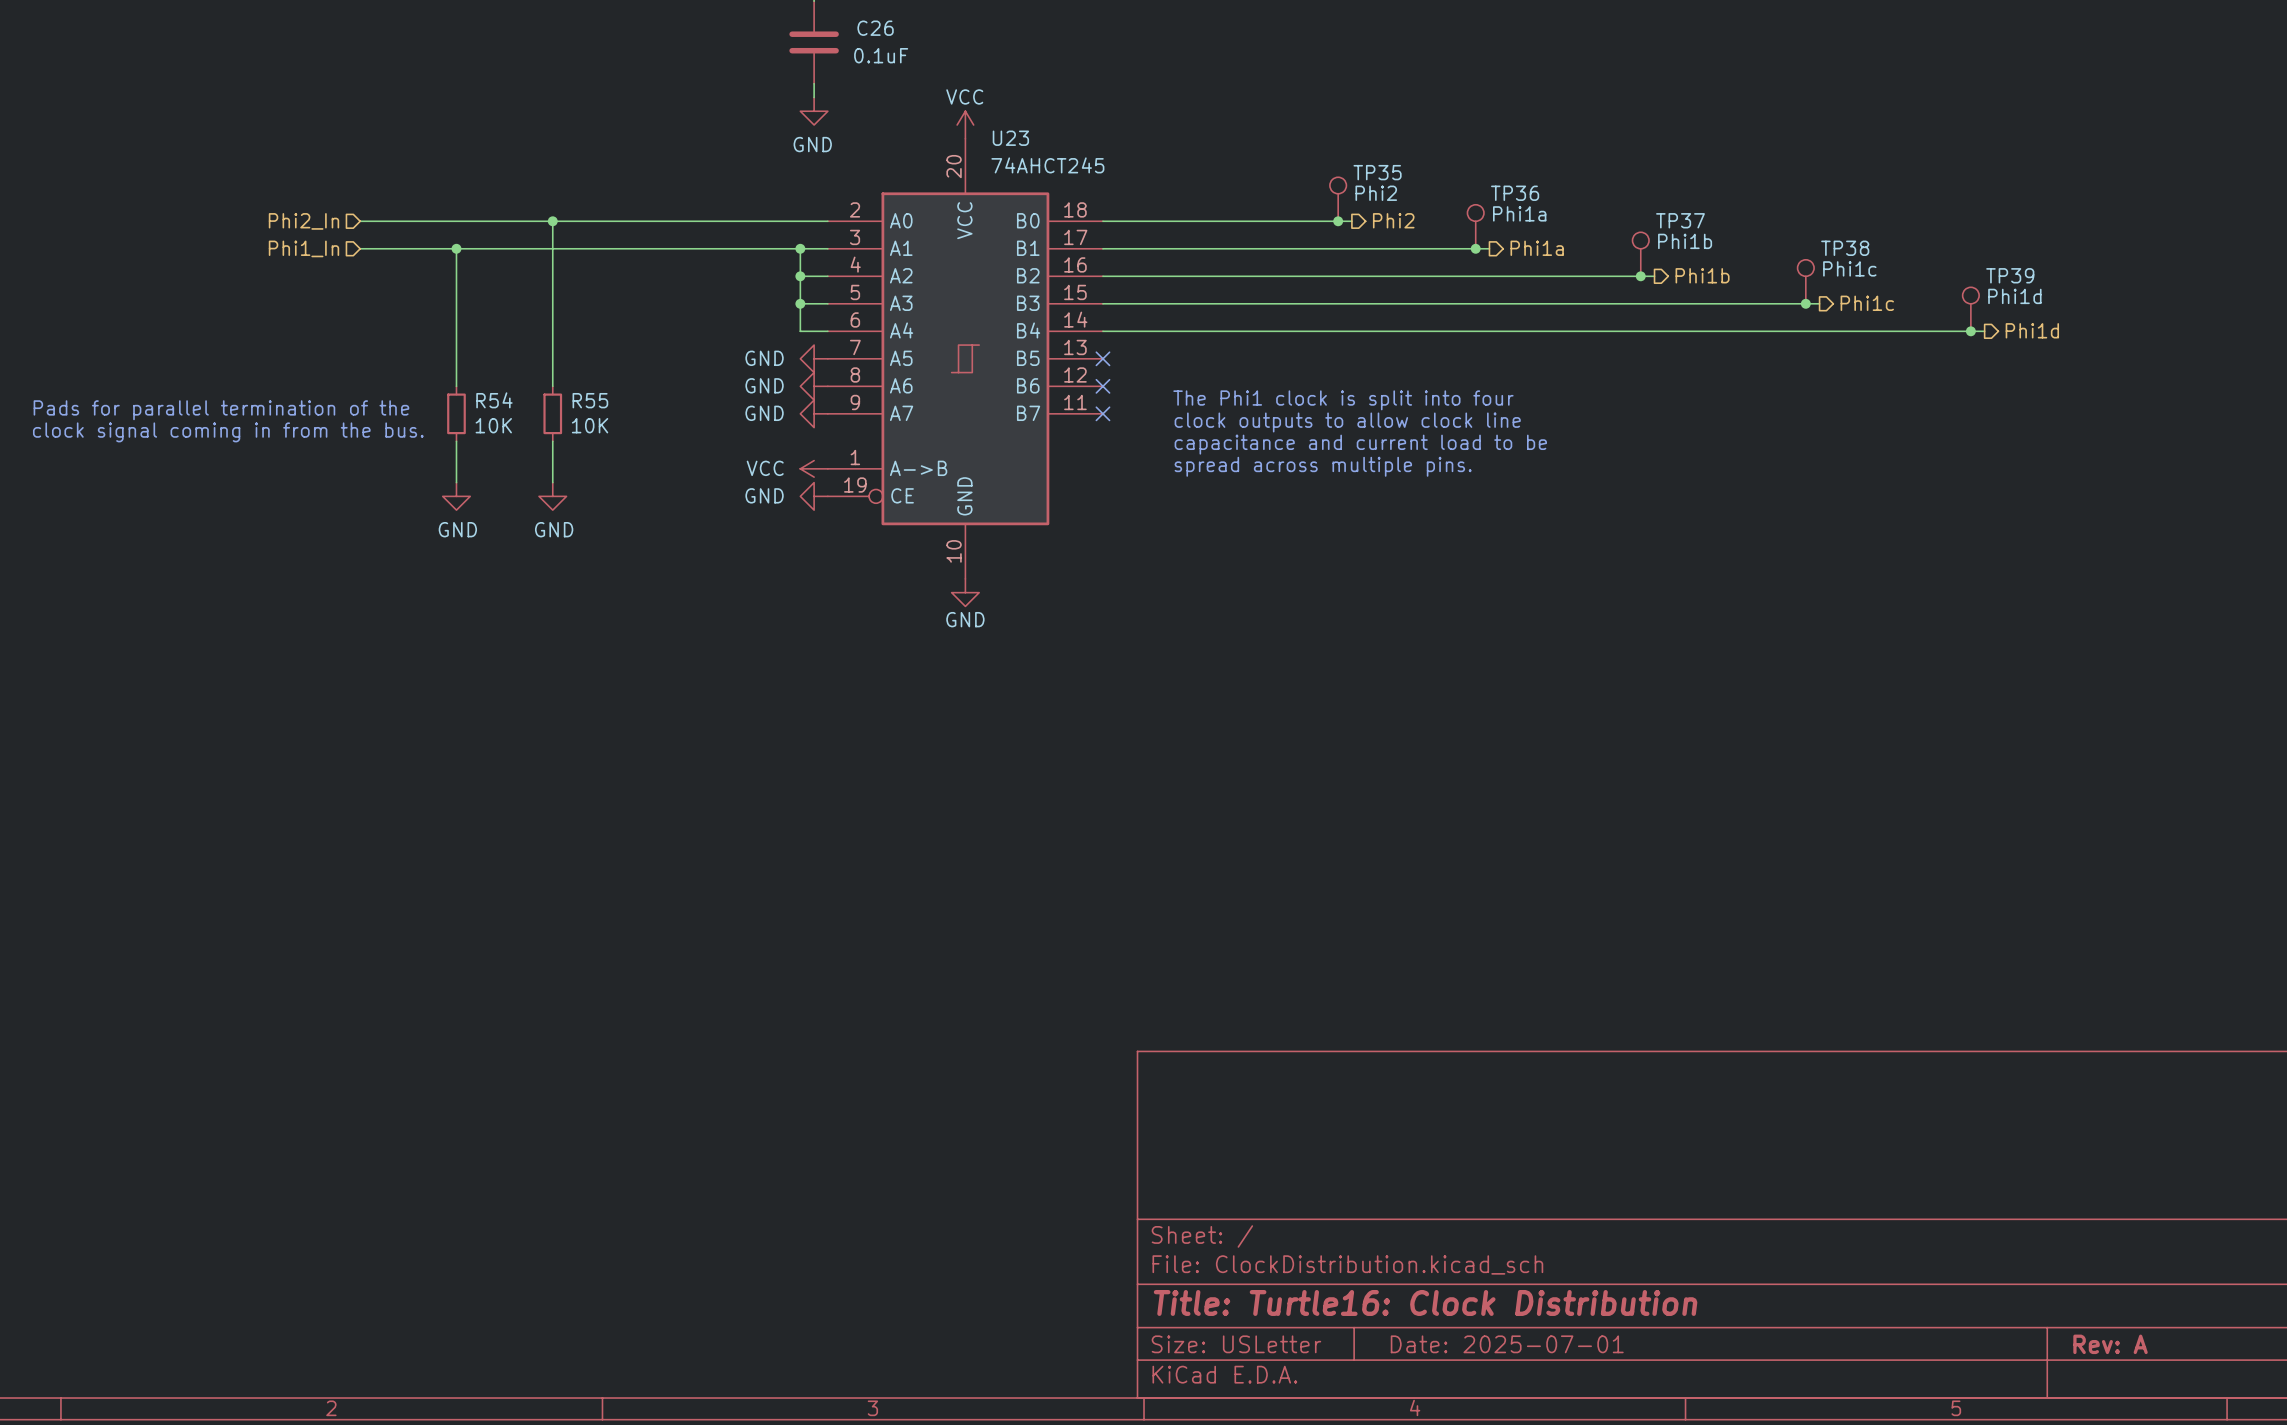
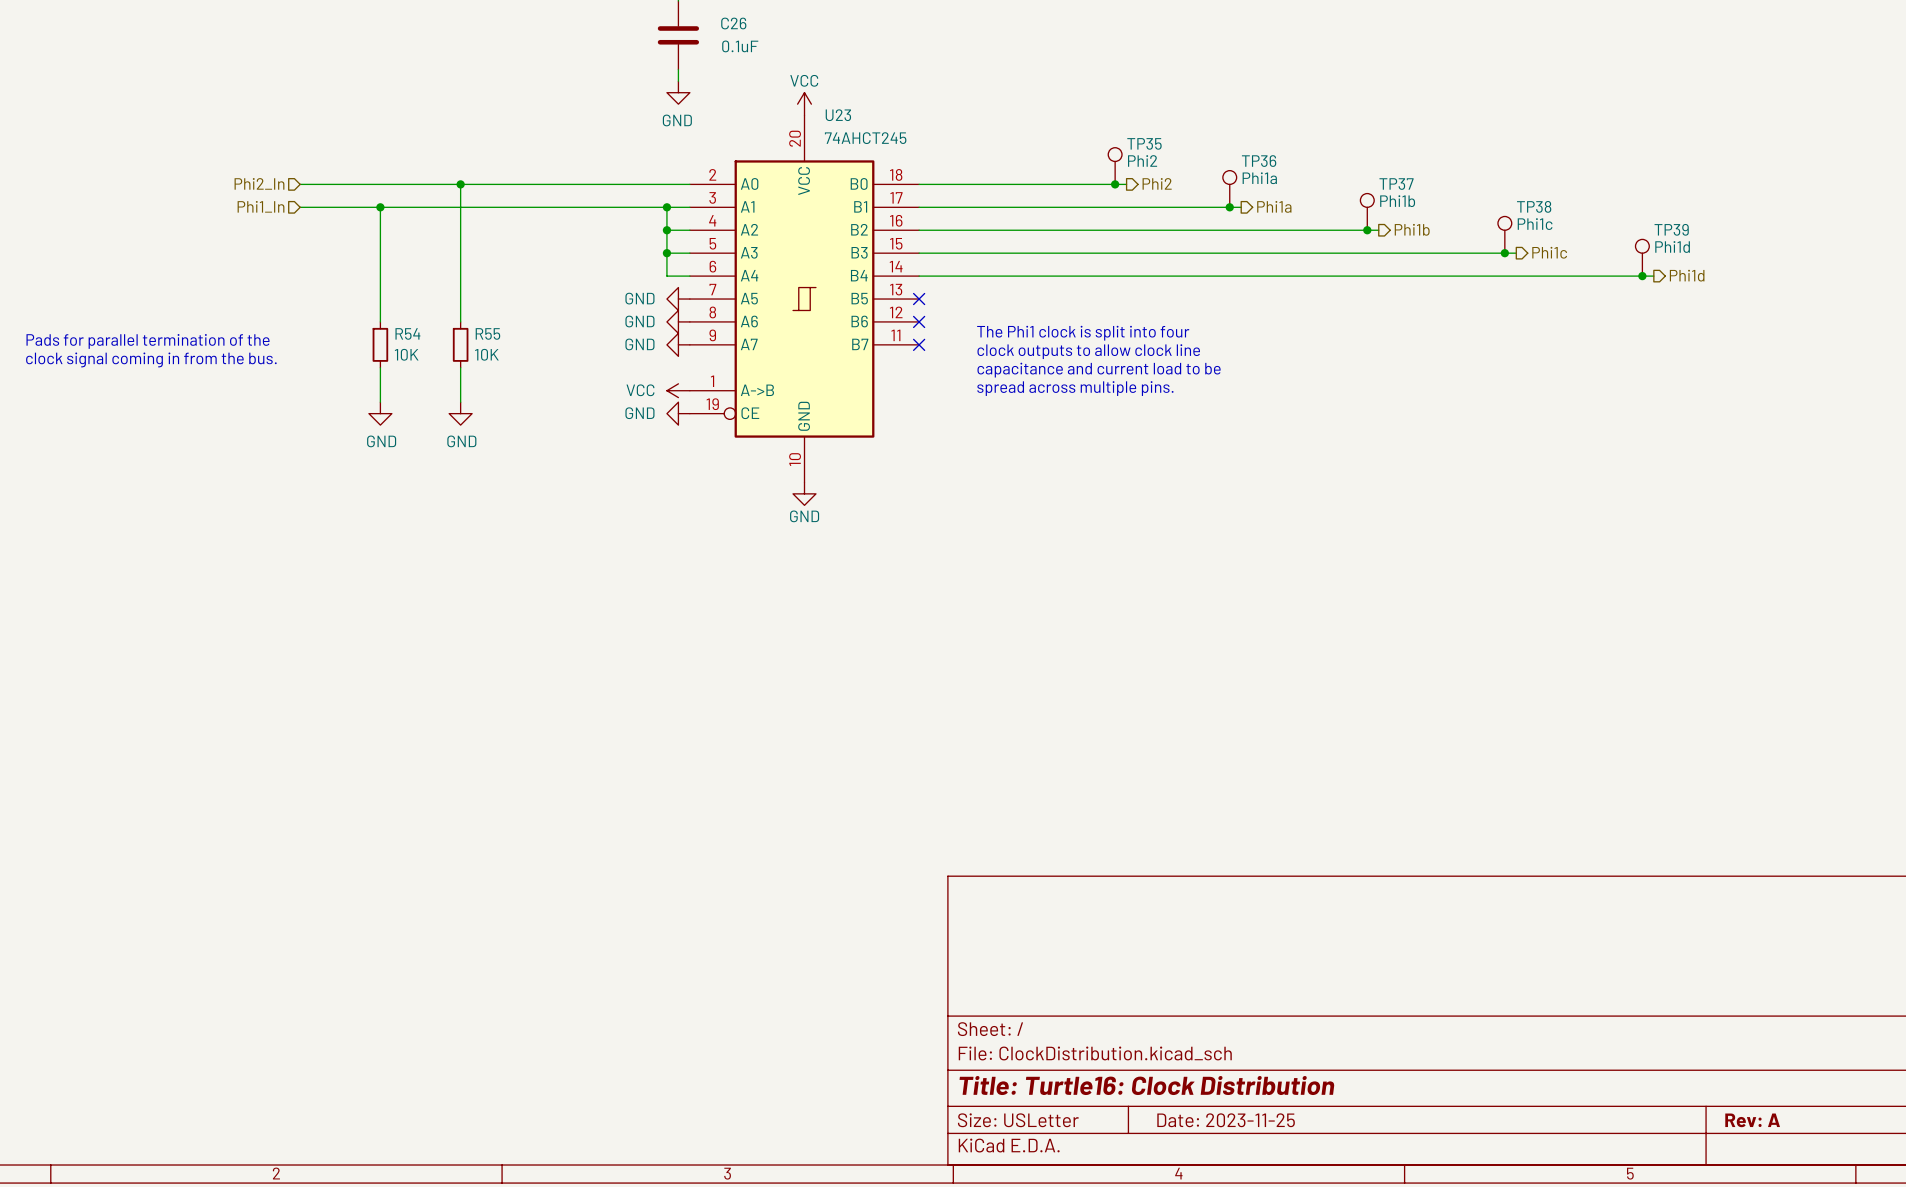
title block: Date: 2025-07-01 (1507, 1344) -> Date: 2023-11-25 (1226, 1120)

